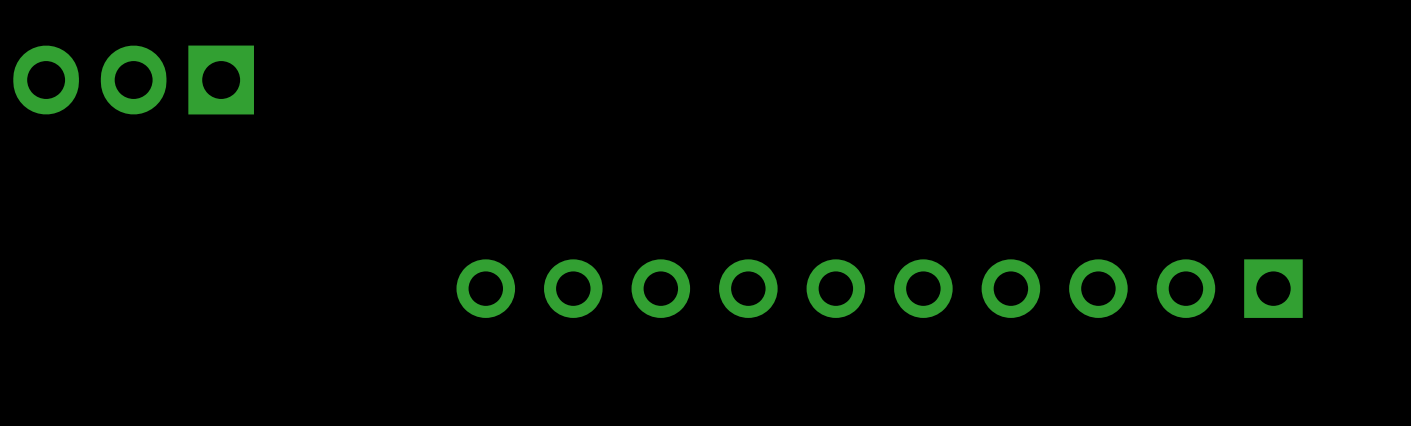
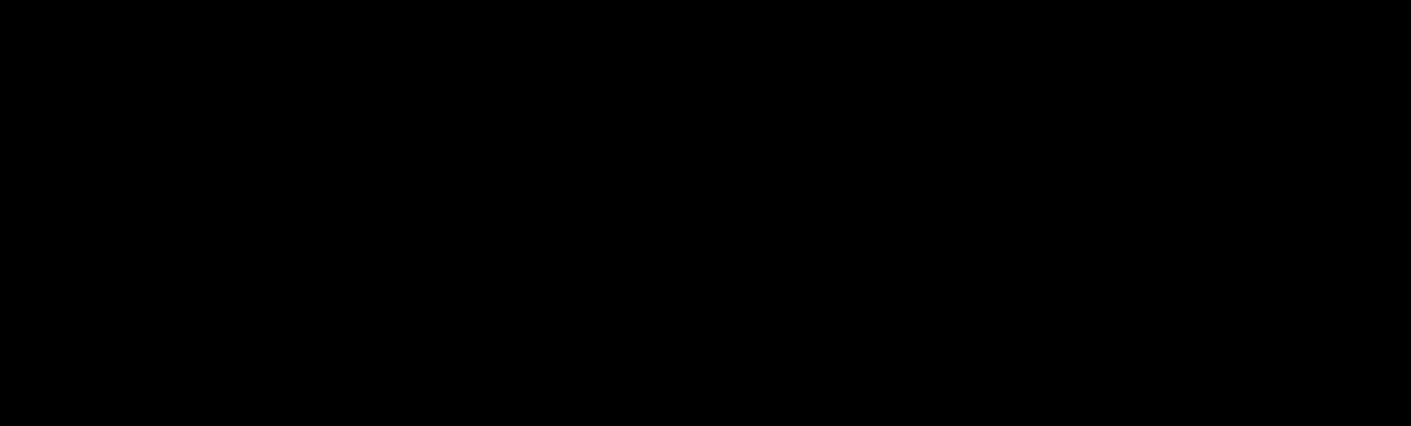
part: (133, 80) -> none
part: (879, 288) -> none

